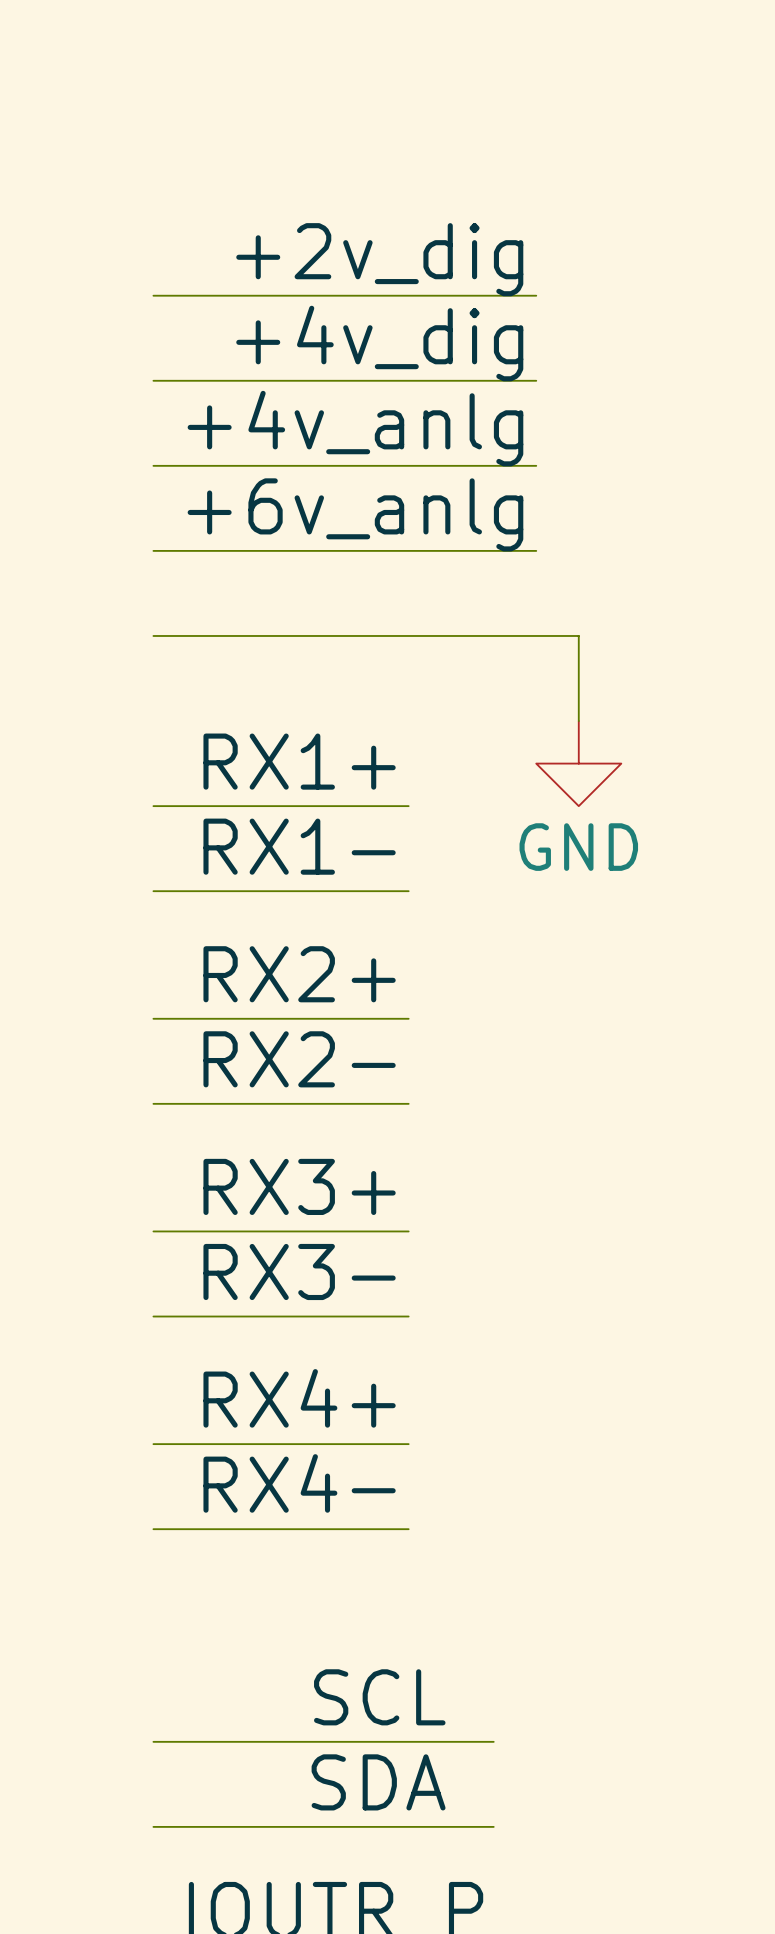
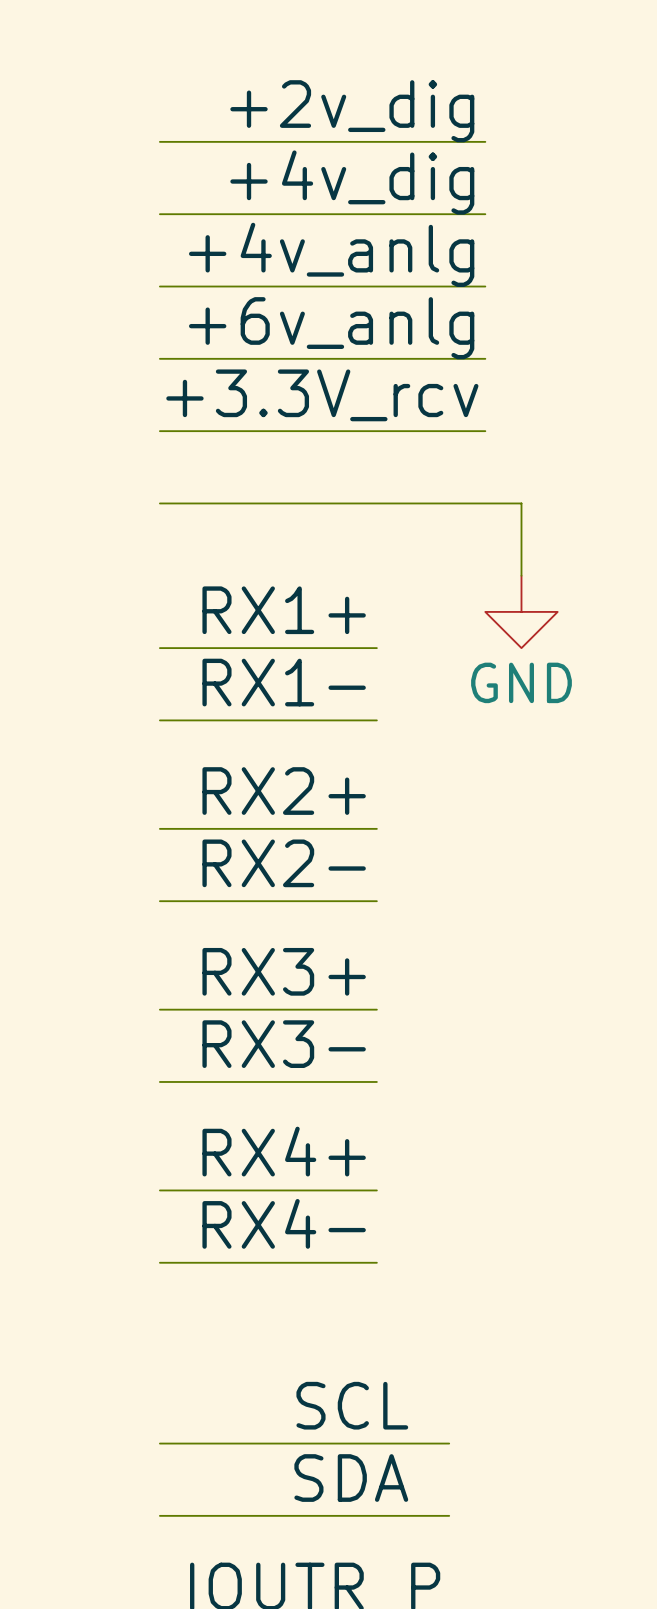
label: none -> +2v_dig (352, 111)
wire: none -> (159, 141) (485, 141)
label: +2v_dig (379, 259) -> +4v_dig (352, 182)
label: +4v_dig (379, 343) -> +4v_anlg (331, 254)
label: +4v_anlg (355, 428) -> +6v_anlg (331, 328)
label: +6v_anlg (355, 514) -> +3.3V_rcv (322, 395)

